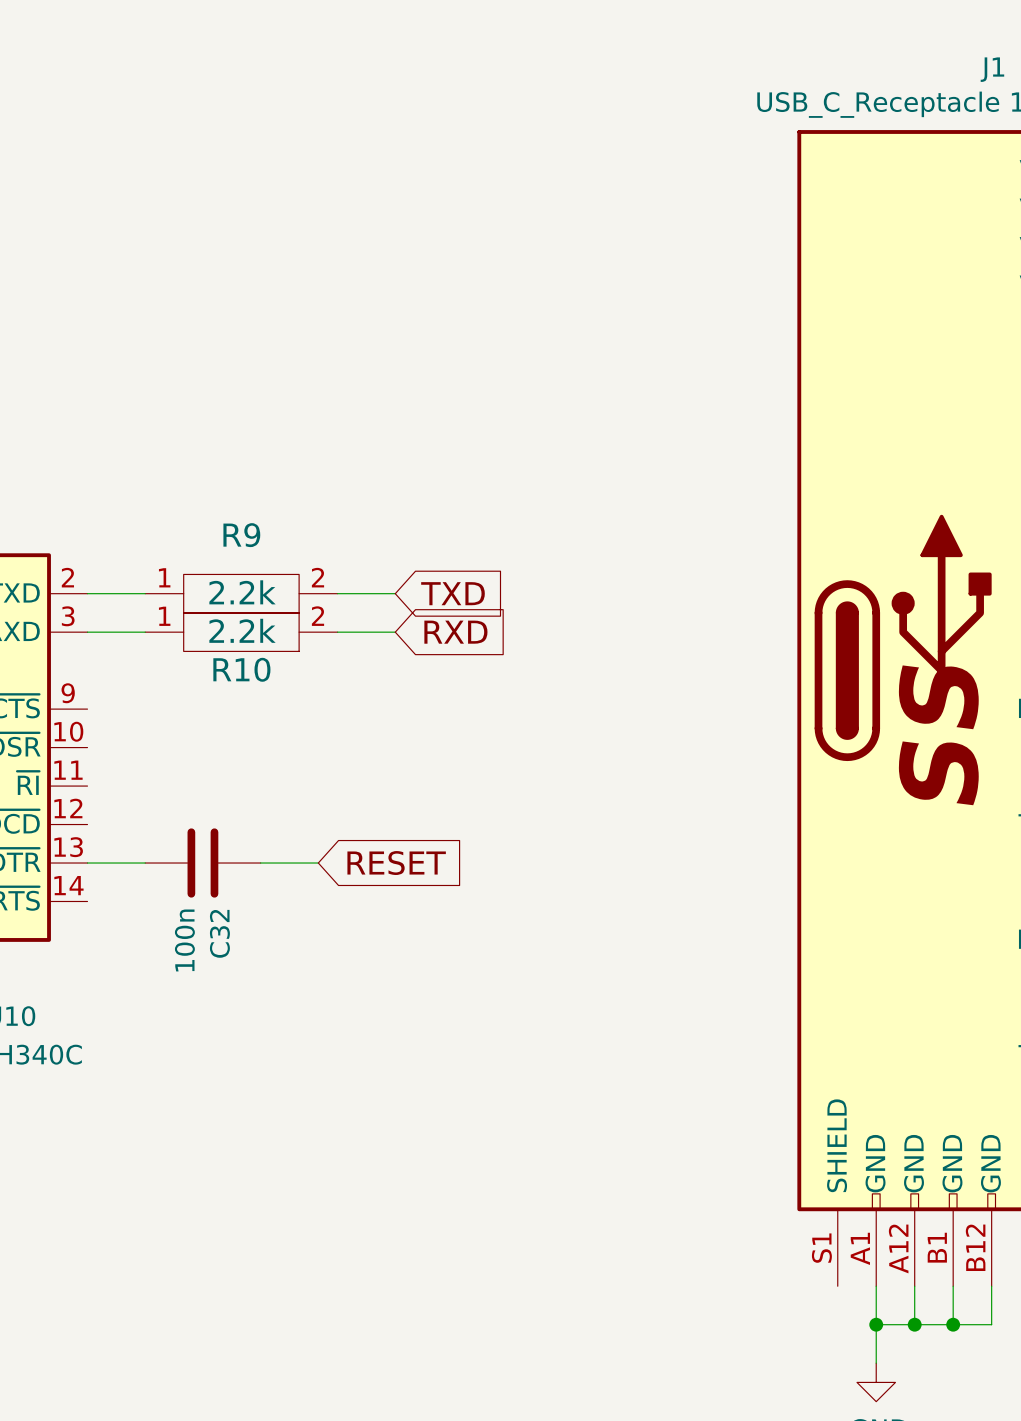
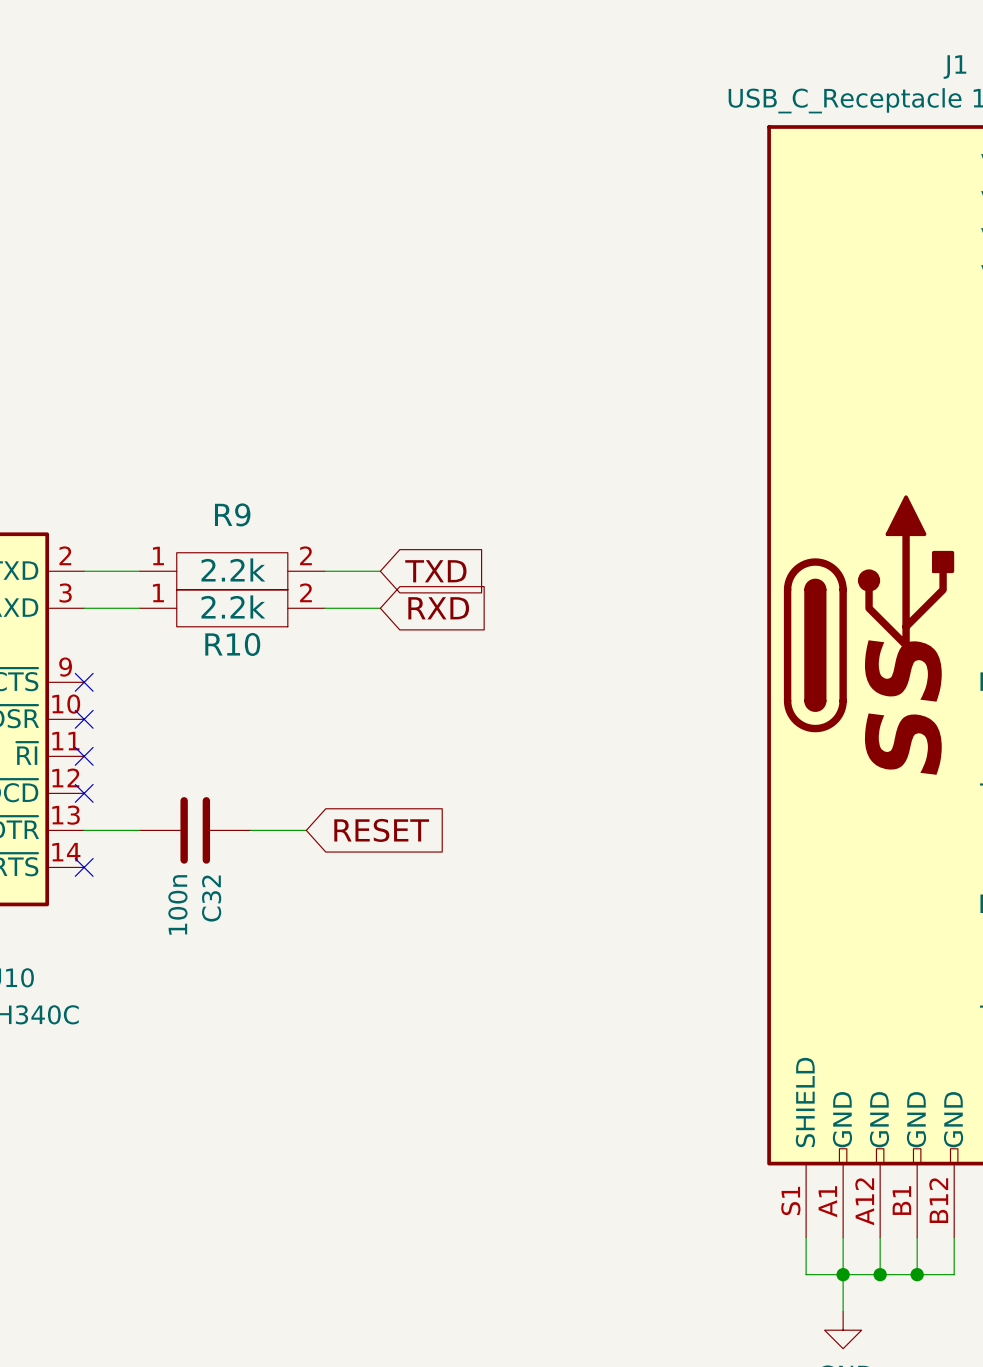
no-connect mark: none -> (84, 682)
no-connect mark: none -> (84, 719)
no-connect mark: none -> (84, 756)
no-connect mark: none -> (84, 793)
no-connect mark: none -> (84, 867)
wire: none -> (806, 1237) (806, 1274) (843, 1274)

